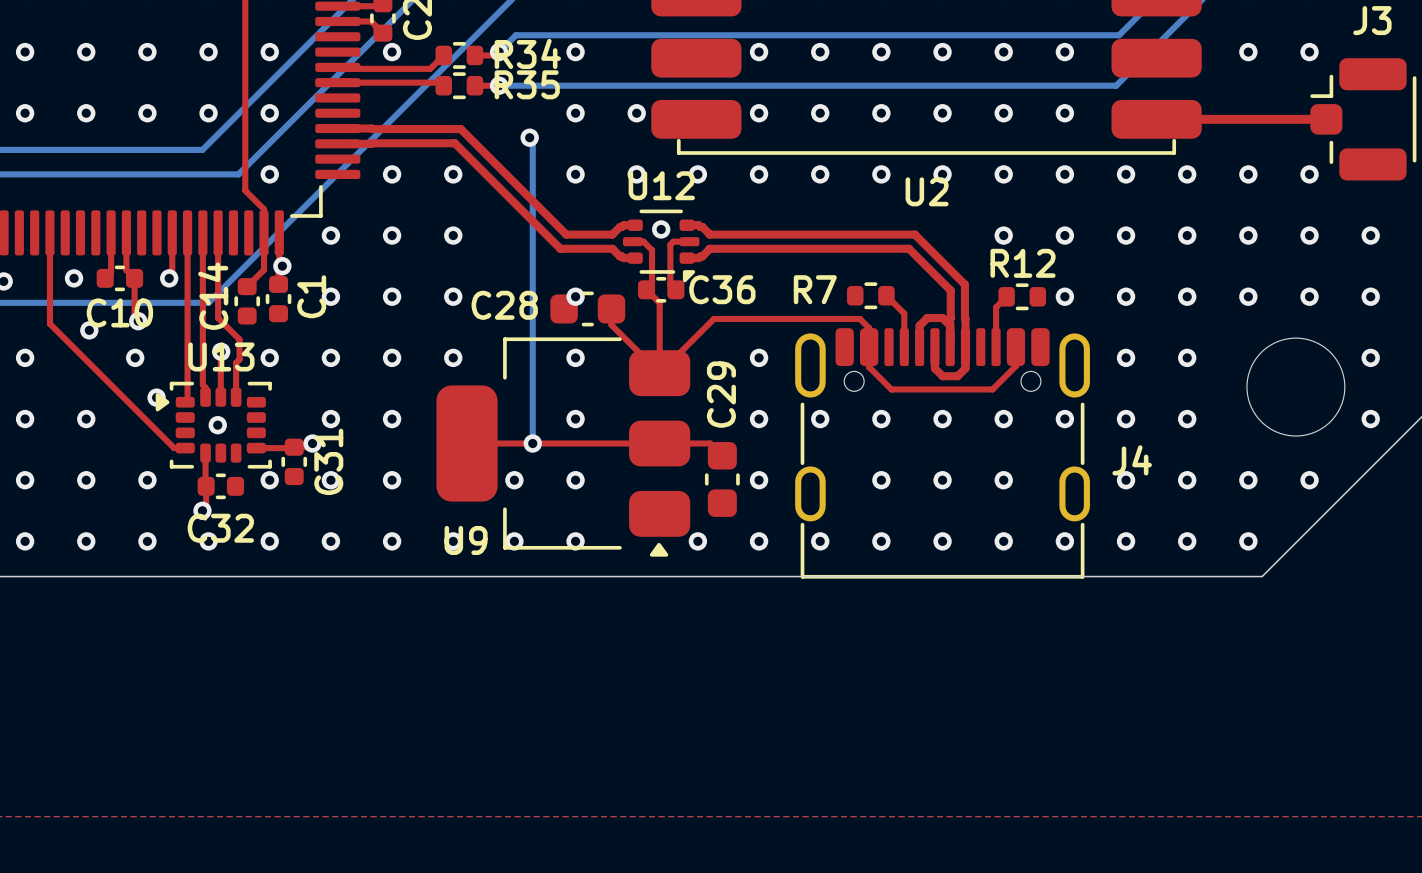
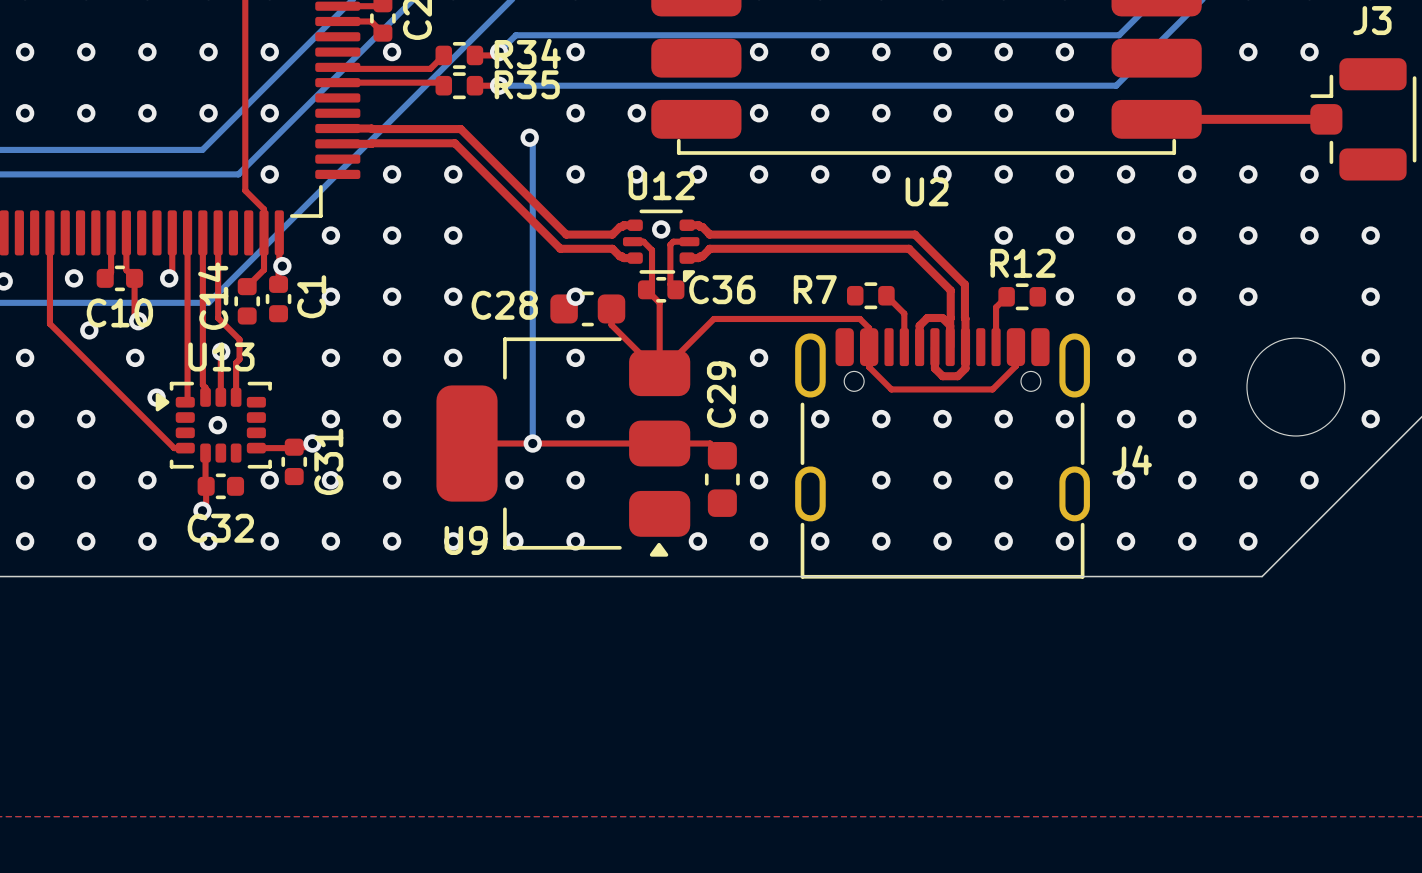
via: (1309, 296) -> none
via: (269, 357) -> none

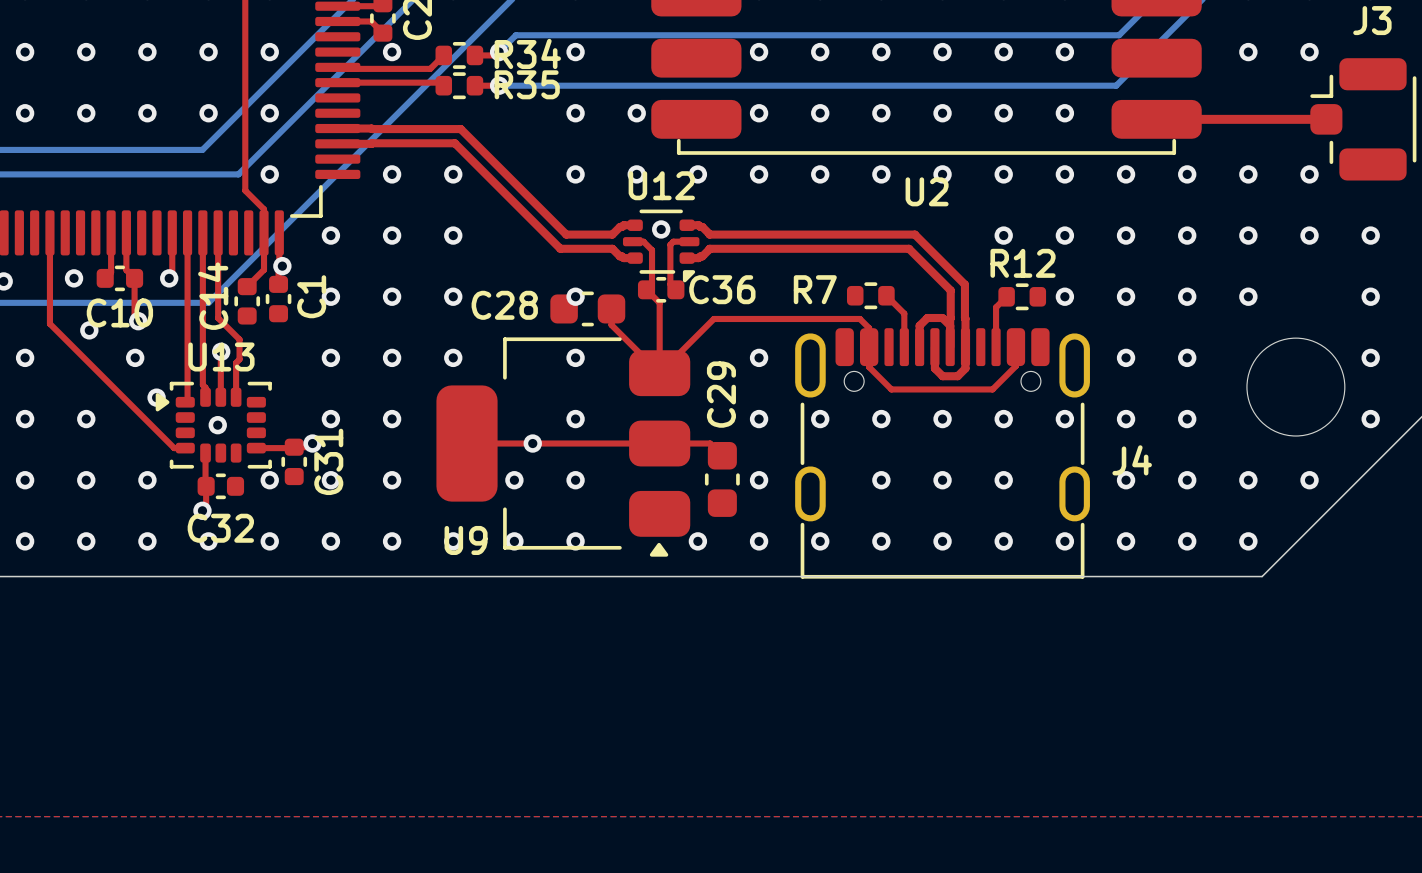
bottom track: (529, 137) (532, 140) (532, 443) -> none
via: (529, 137) -> none

